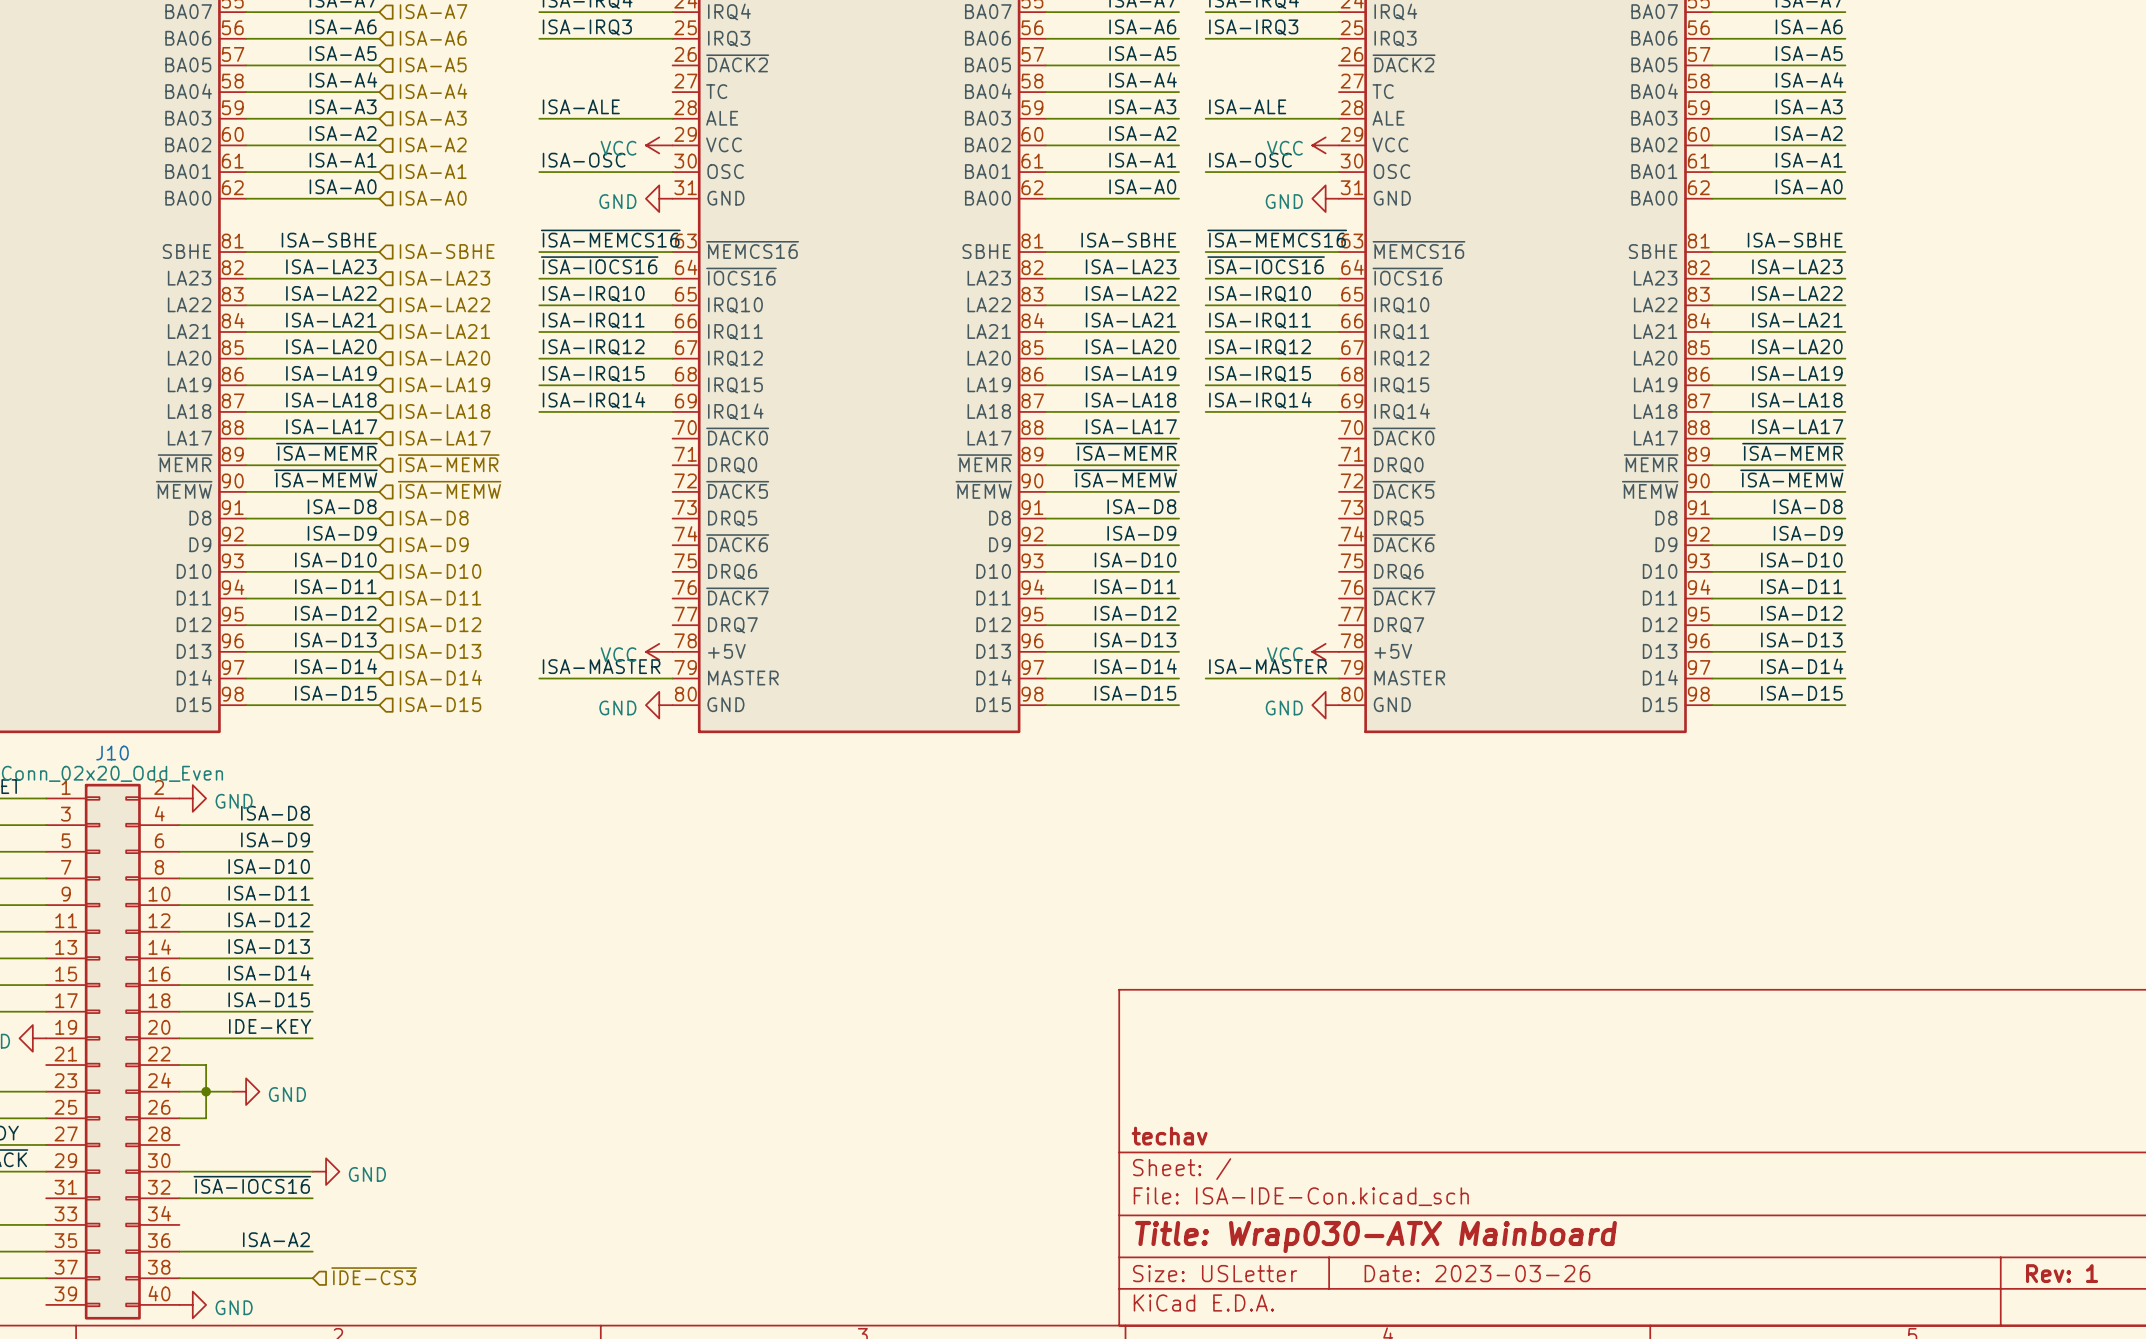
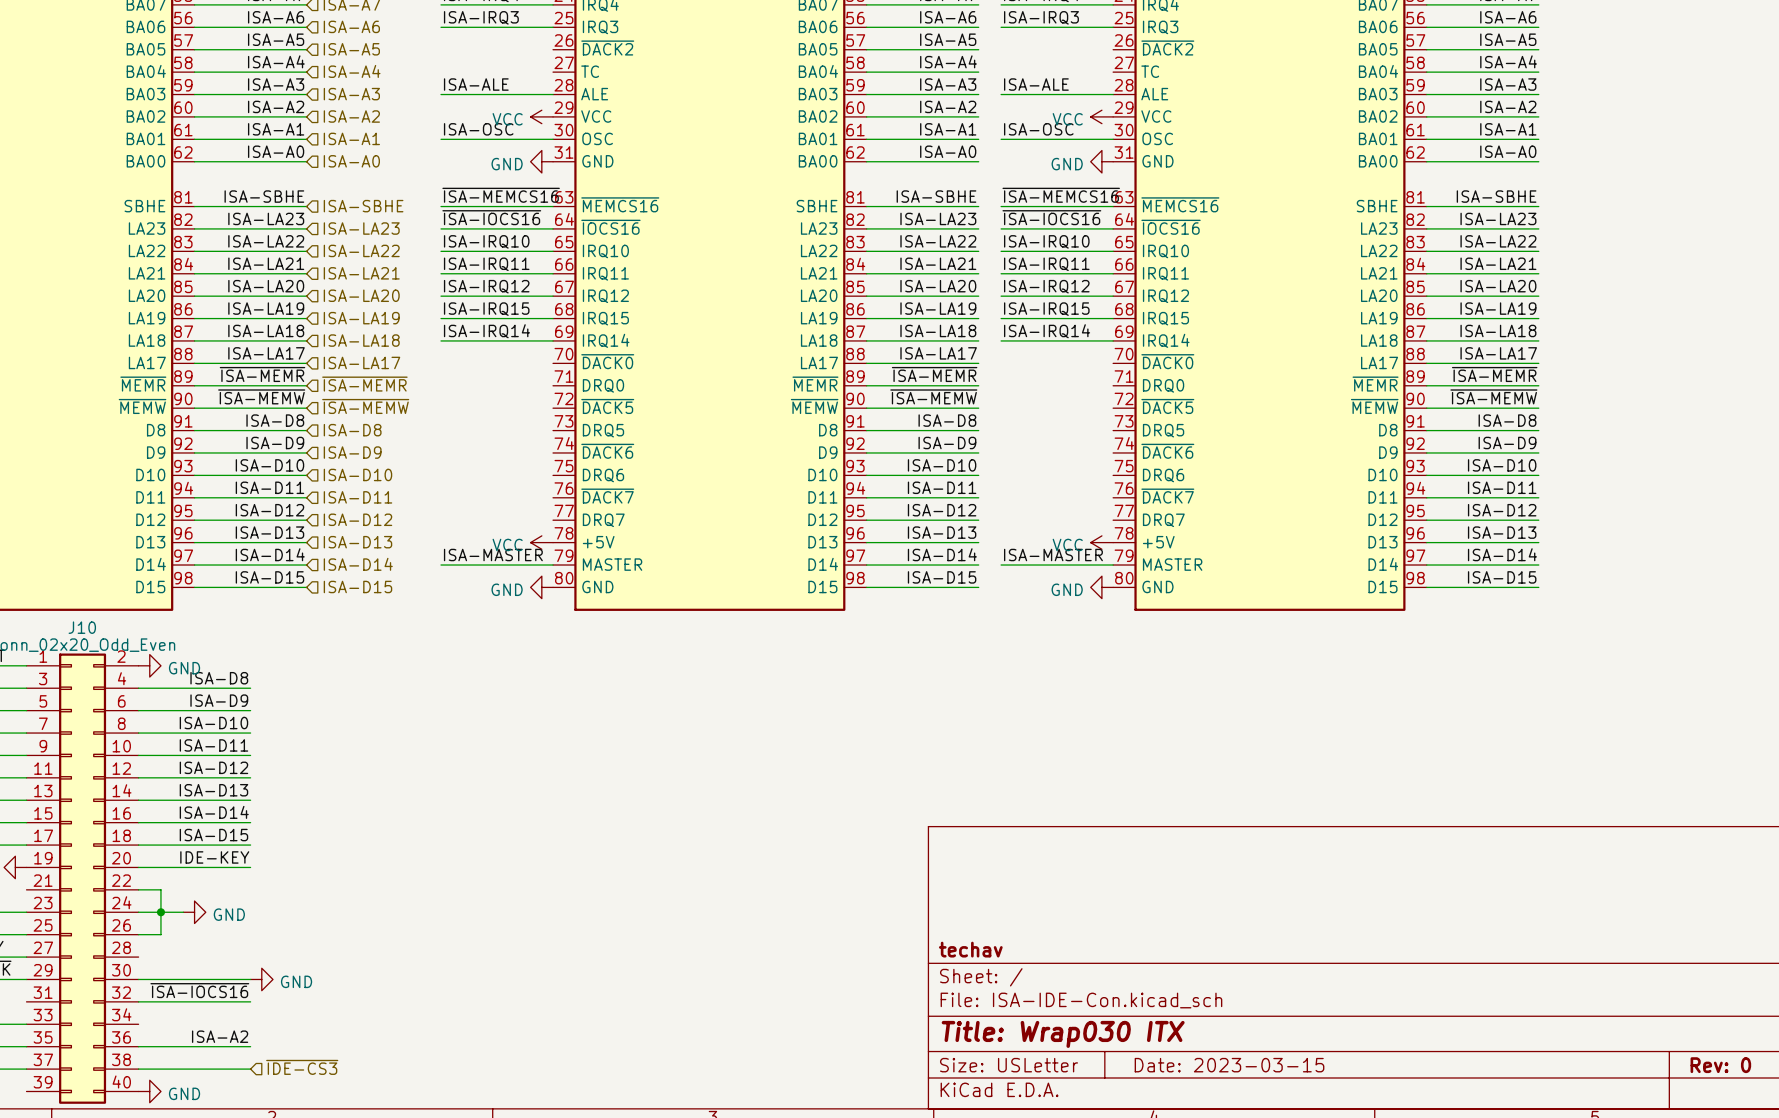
title block: Title: Wrap030-ATX Mainboard (1375, 1237) -> Title: Wrap030 ITX (1063, 1034)
title block: Date: 2023-03-26 (1477, 1273) -> Date: 2023-03-15 (1229, 1065)
title block: Rev: 1 (2062, 1273) -> Rev: 0 (1720, 1065)

